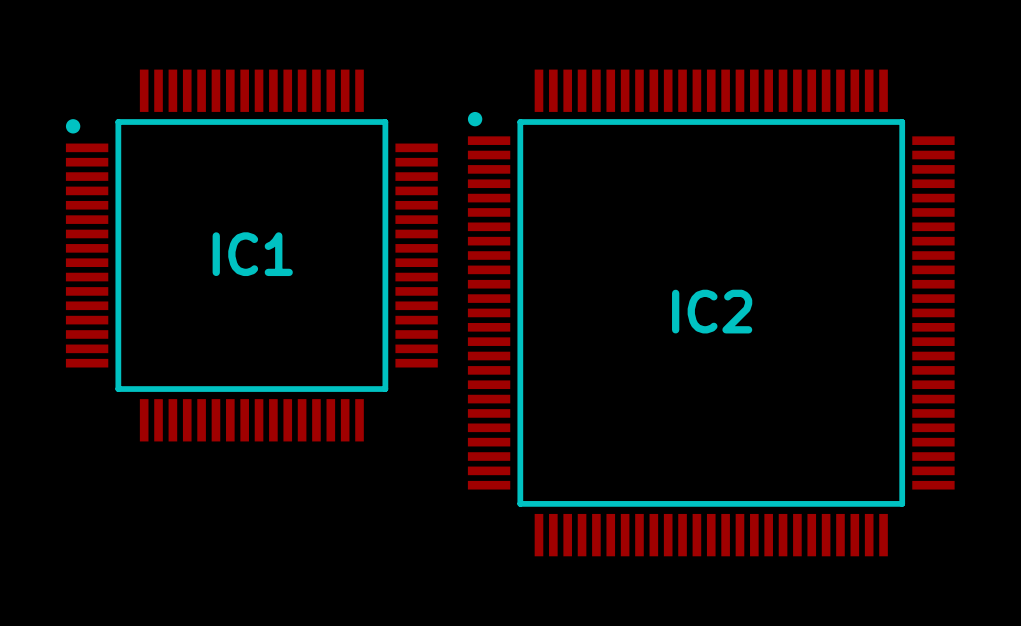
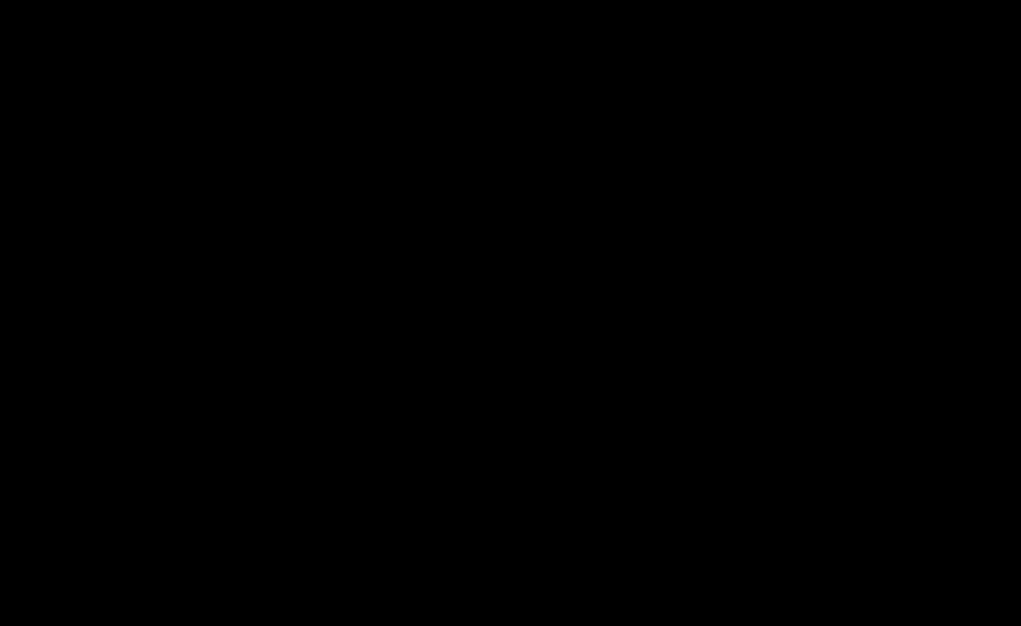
IC1: (251, 255) -> none
IC2: (711, 312) -> none

